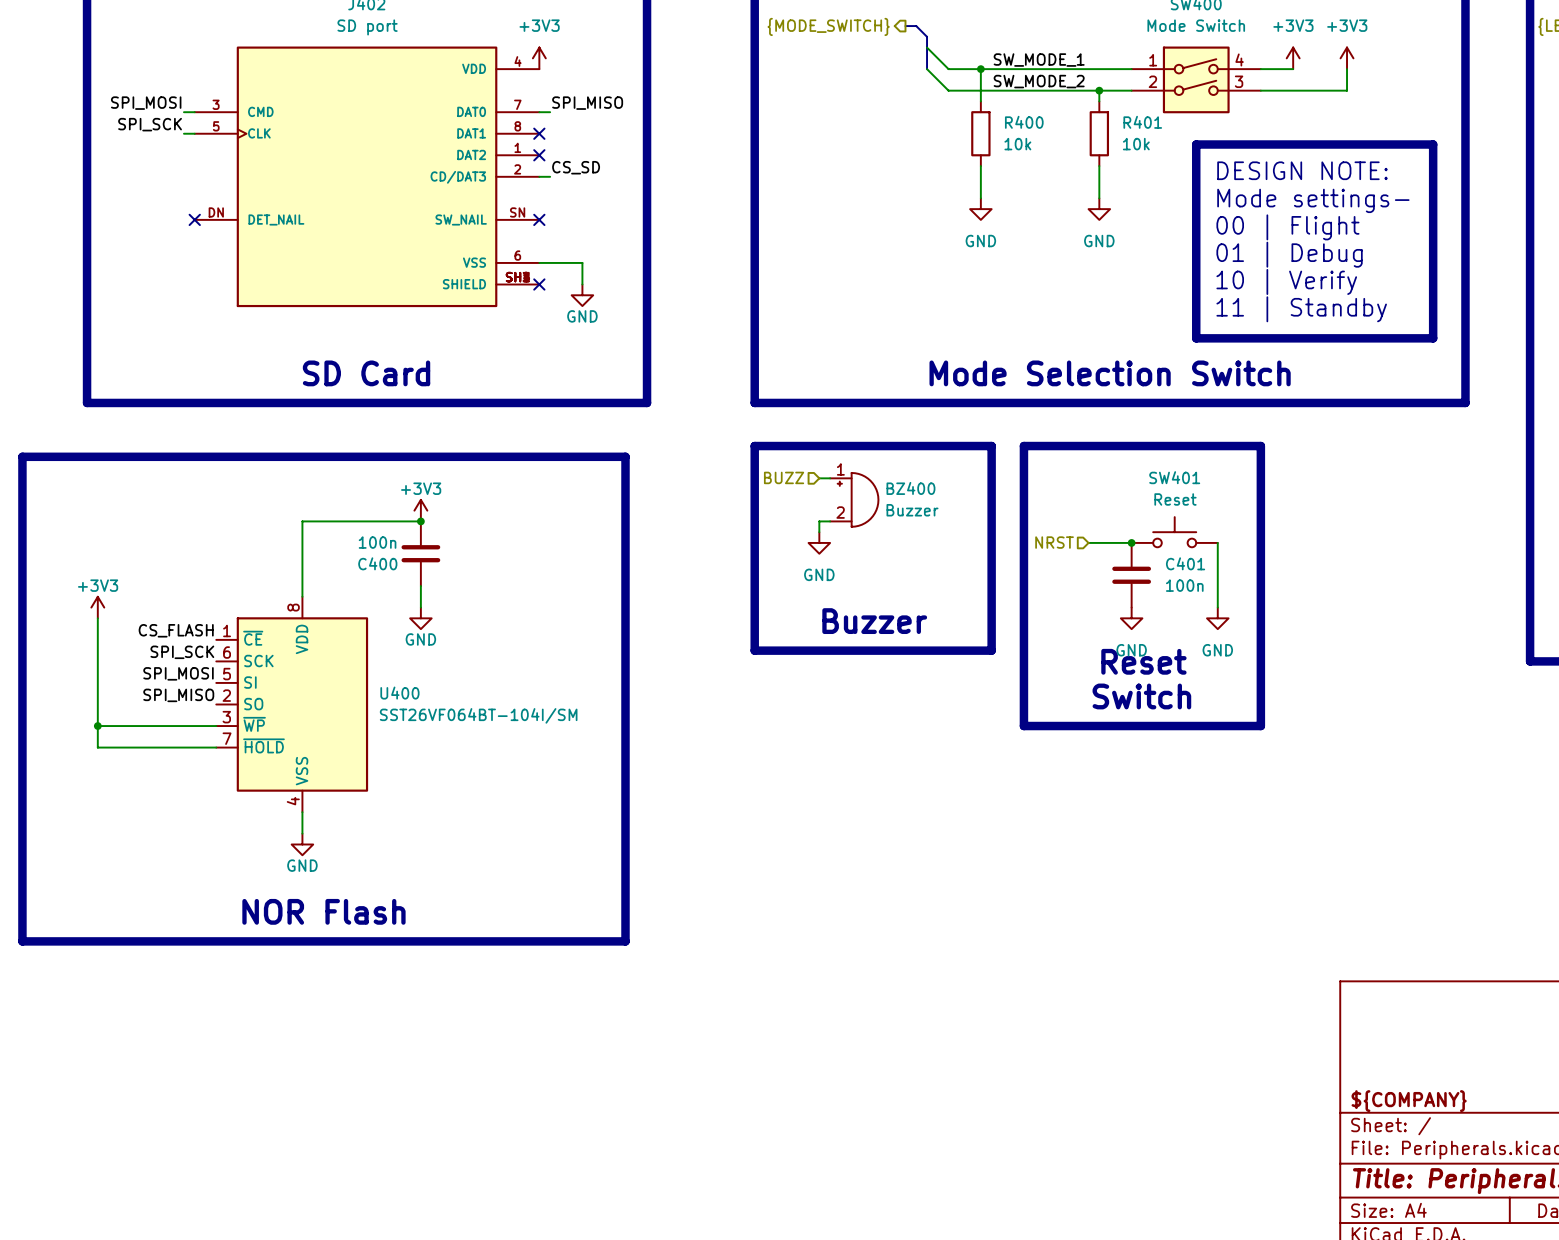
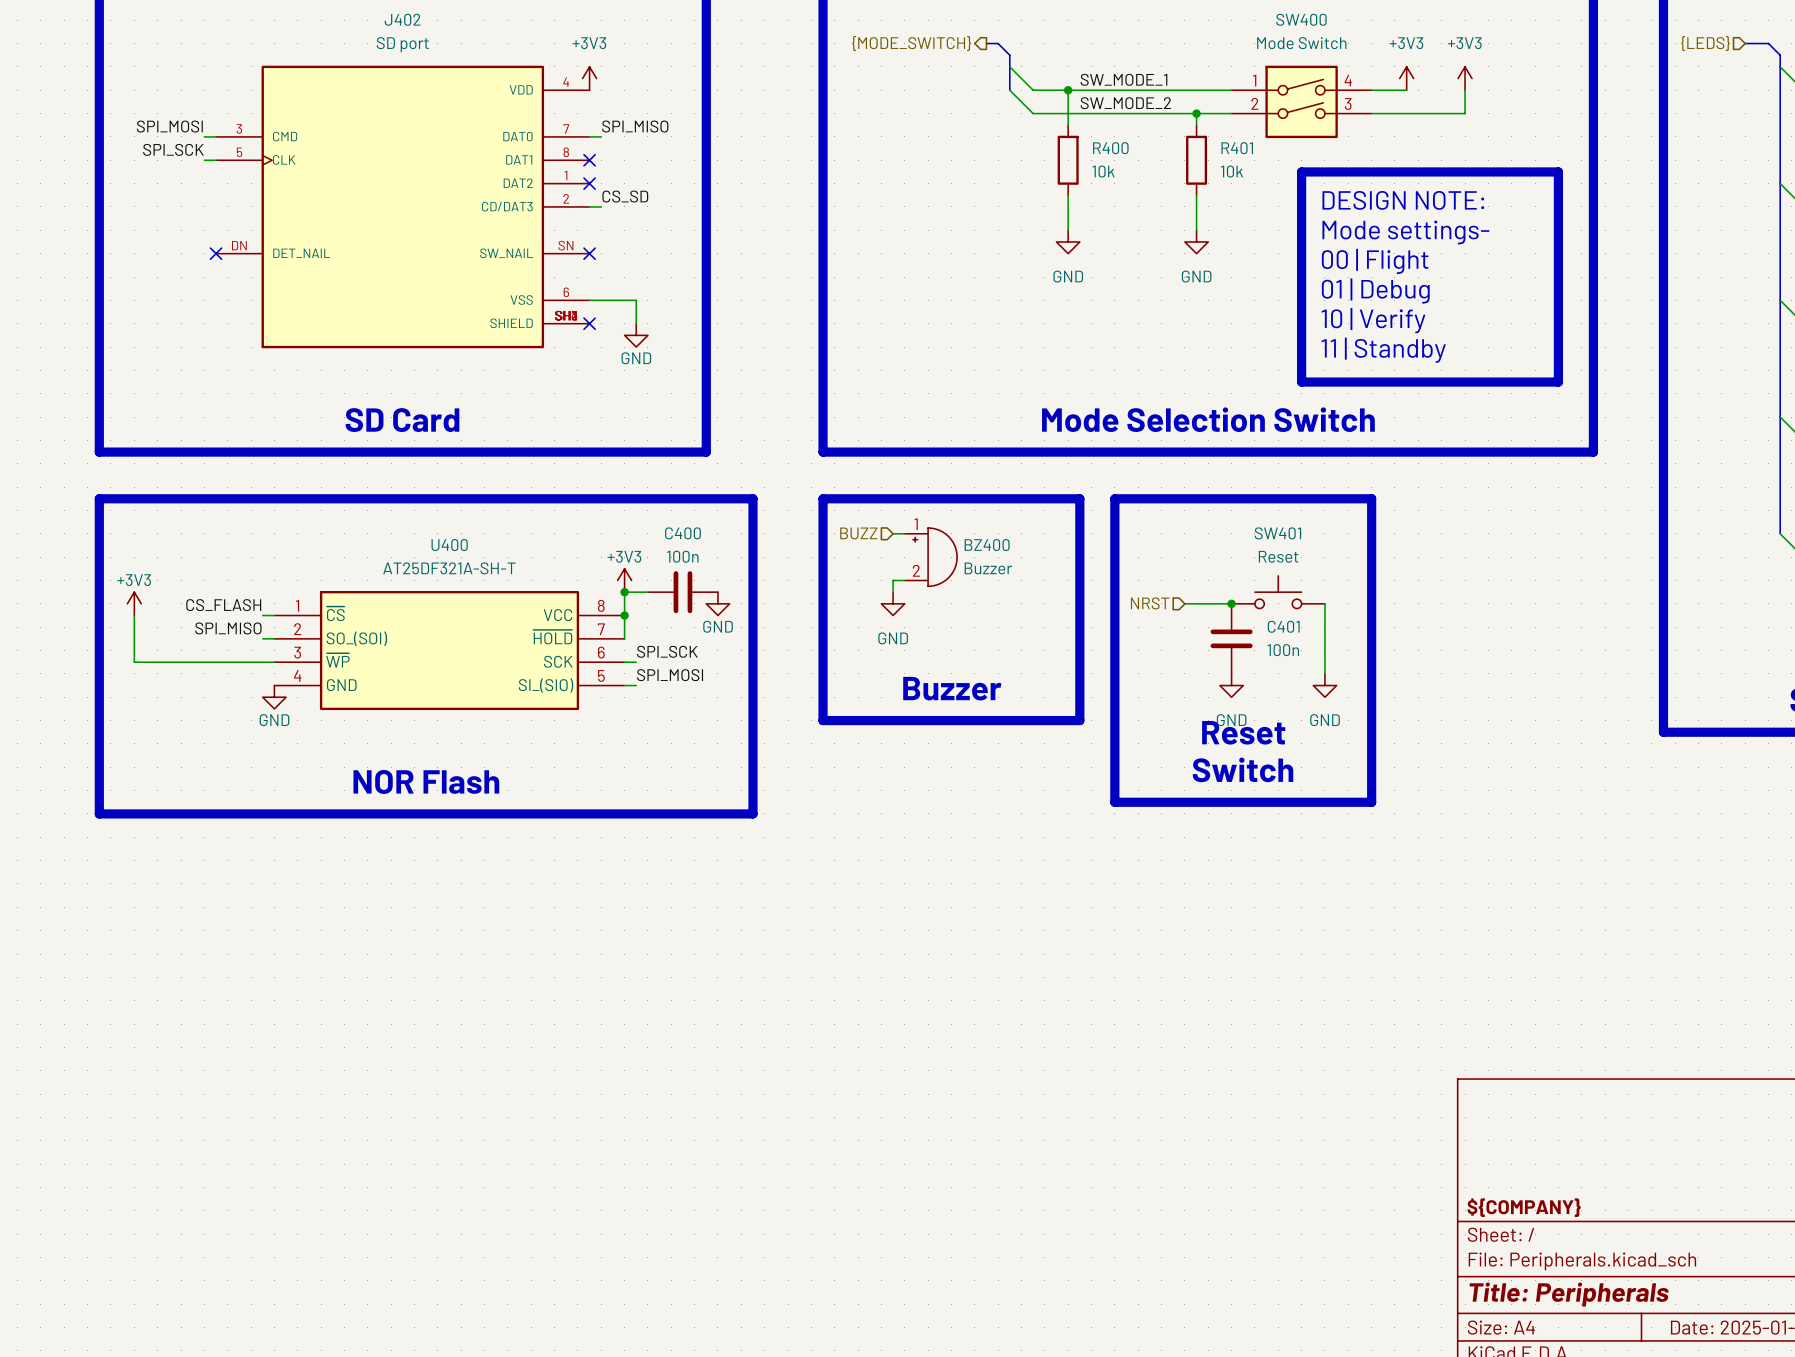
line: none -> (99, 498) (752, 498) (752, 813) (99, 813) (99, 498)
line: (22, 456) (625, 456) (625, 941) (22, 941) (22, 456) -> none
power symbol position: +3V3 (420, 510) -> +3V3 (624, 580)
wire: (420, 521) (302, 521) (302, 596) -> none
junction: (420, 521) -> none
junction: none -> (624, 592)
wire: none -> (647, 592) (624, 592) (624, 638)
power symbol: none -> GND (717, 603)
wire: none -> (134, 615) (134, 662) (274, 662)
wire: none -> (262, 615) (274, 615)
C400 rotation: 0° (420, 553) -> 90° clockwise (682, 592)
C400 position: (420, 553) -> (682, 592)
junction: none -> (624, 615)
wire: none -> (262, 638) (274, 638)
label: none -> SPI_SCK (667, 651)
U400 symbol: [216, 596, 369, 813] -> [274, 591, 625, 711]
wire: none -> (624, 662) (636, 662)
power symbol position: +3V3 (97, 607) -> +3V3 (134, 603)
label: none -> SPI_MOSI (670, 675)
wire: (97, 618) (97, 747) (216, 747) -> none
power symbol: GND (420, 618) -> none
wire: none -> (624, 685) (636, 685)
power symbol: none -> GND (274, 697)
label position: CS_FLASH (176, 630) -> CS_FLASH (223, 605)
label: SPI_SCK (182, 652) -> none
label: SPI_MOSI (178, 673) -> none
U400 name position: U400 (399, 693) -> U400 (449, 545)
label position: SPI_MISO (178, 695) -> SPI_MISO (228, 628)
text: none -> NOR Flash (426, 781)
U400 value: SST26VF064BT-104I/SM (478, 715) -> AT25DF321A-SH-T (449, 568)
wire: (97, 726) (216, 726) -> none
junction: (97, 726) -> none
wire: (302, 812) (302, 833) -> none
power symbol: GND (302, 844) -> none
text: NOR Flash (323, 911) -> none

